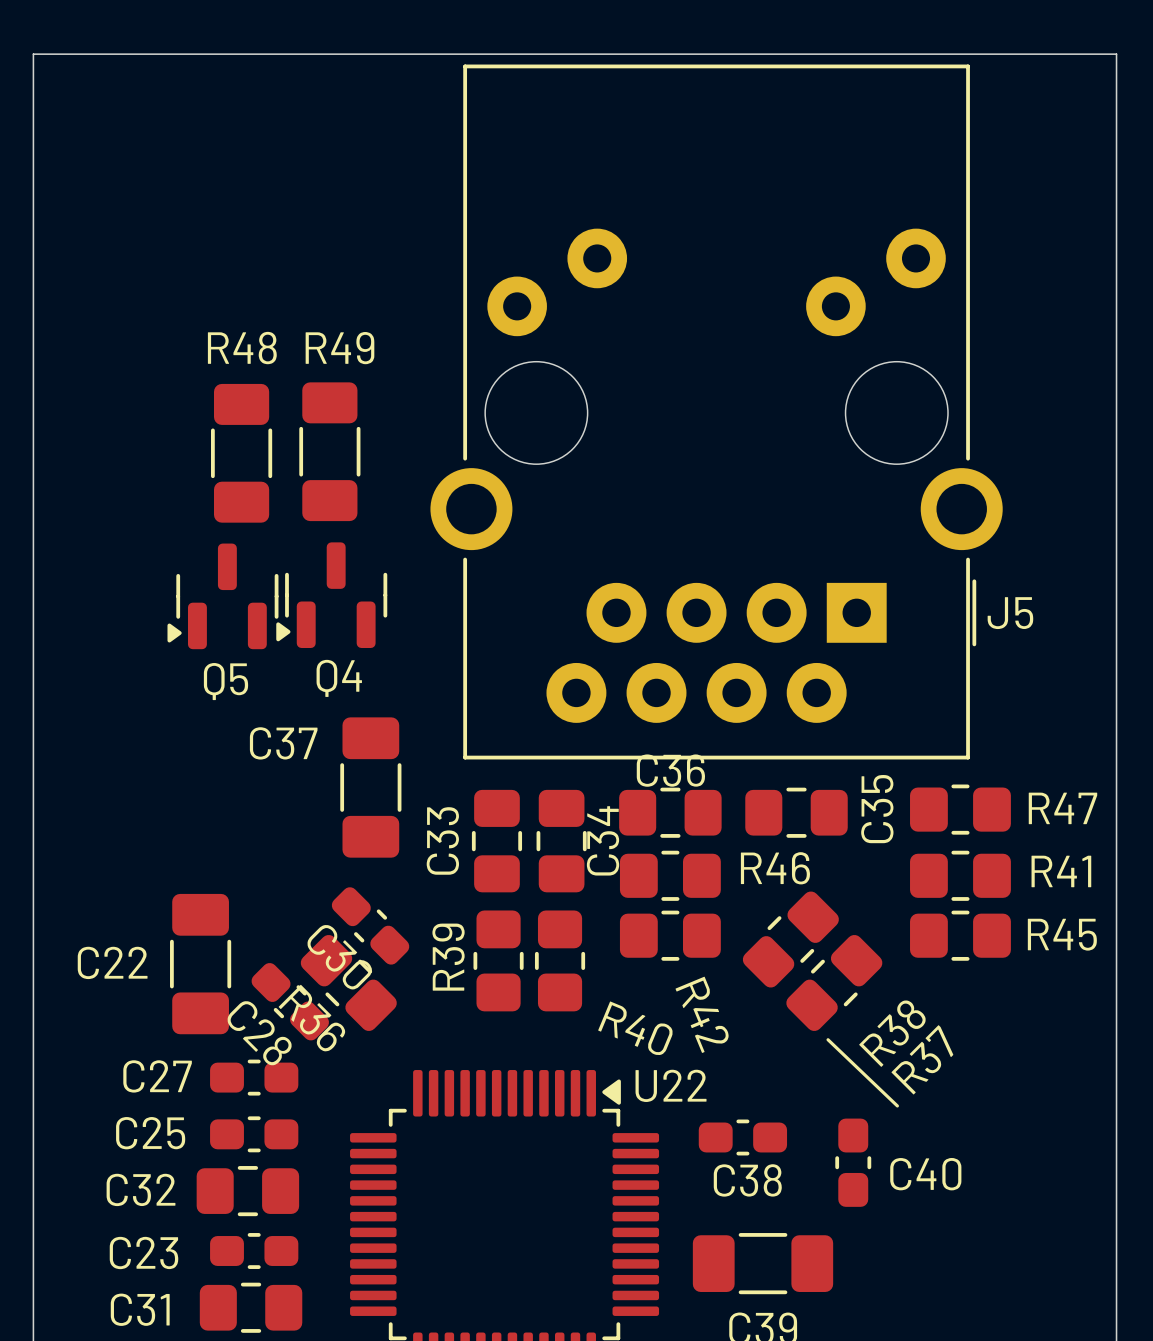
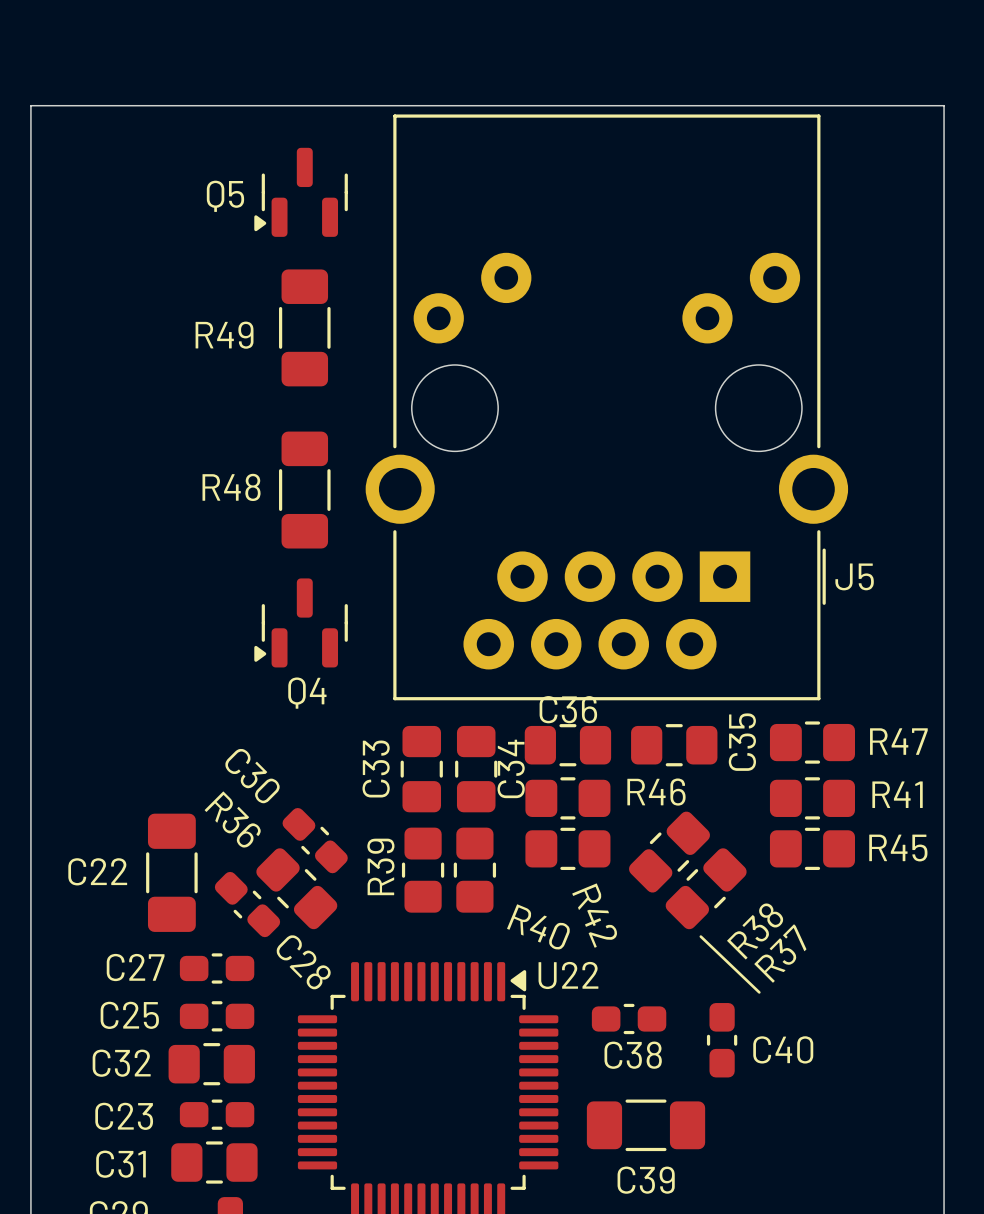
R48 name position: R48 (242, 348) -> R48 (231, 487)
R49 name position: R49 (339, 348) -> R49 (224, 335)
R48 position: (329, 451) -> (304, 490)
R49 position: (241, 453) -> (304, 327)
Q4 position: (331, 595) -> (301, 622)
Q5 position: (222, 596) -> (301, 192)
Q5 name position: Q5 (226, 681) -> Q5 (225, 196)
C37: (370, 787) -> none
C30 name position: C30 (339, 957) -> C30 (252, 775)
R36 name position: R36 (311, 1018) -> R36 (232, 819)
C28 name position: C28 (259, 1033) -> C28 (303, 962)

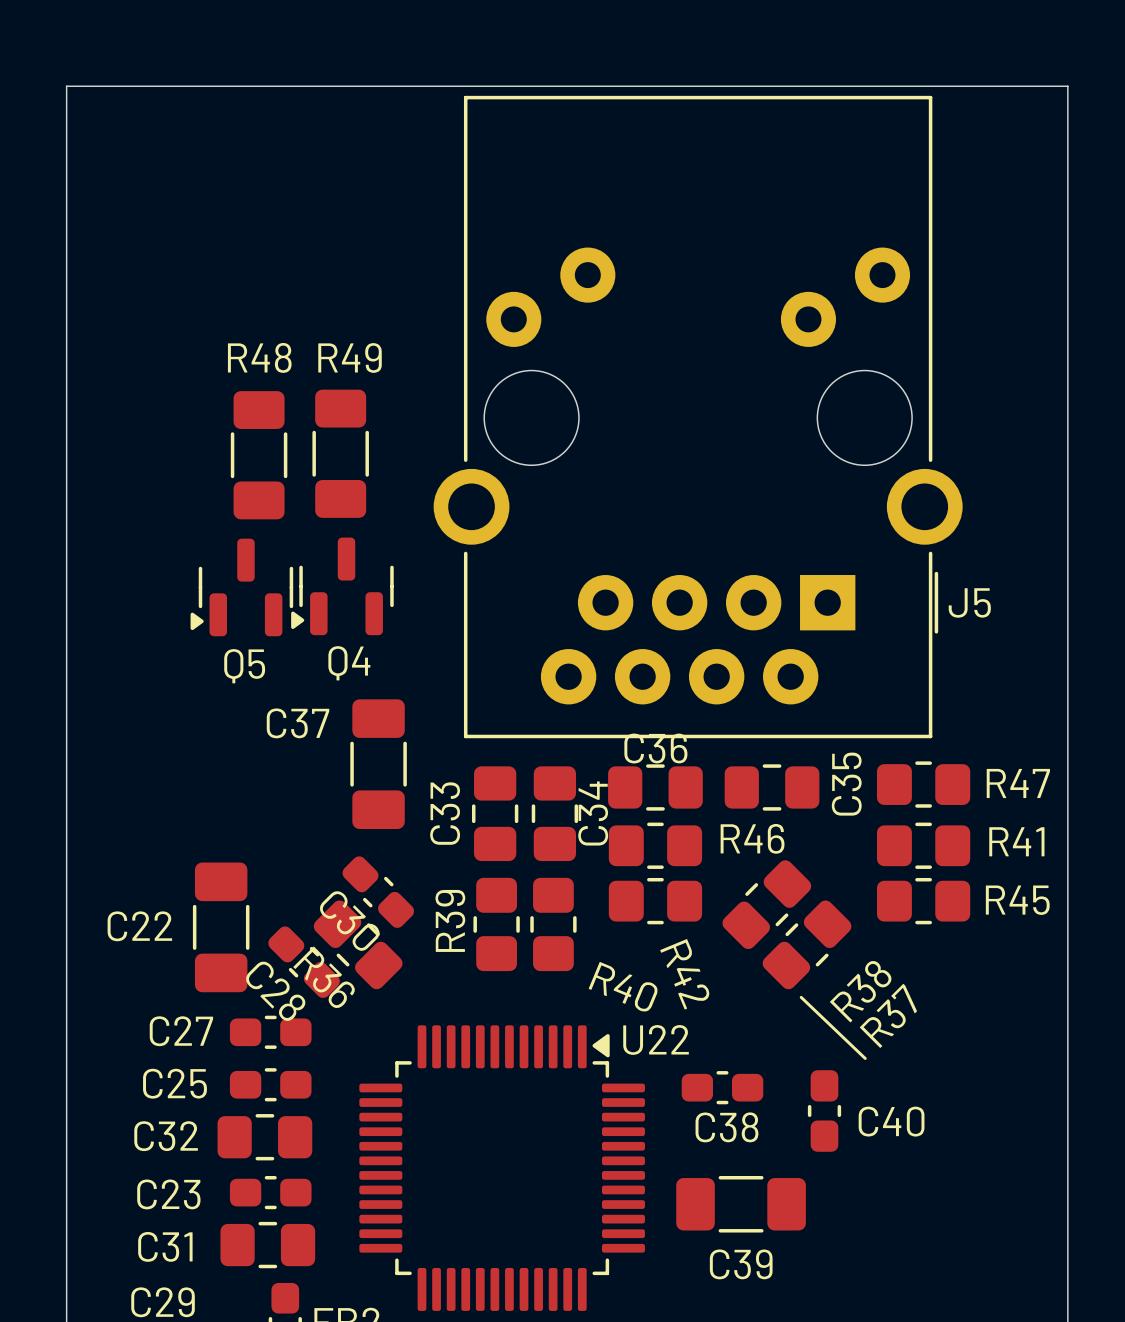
Q5 position: (301, 192) -> (241, 587)
Q5 name position: Q5 (225, 196) -> Q5 (244, 666)
R49 position: (304, 327) -> (259, 455)
R49 name position: R49 (224, 335) -> R49 (350, 357)
R48 name position: R48 (231, 487) -> R48 (259, 357)
R48 position: (304, 490) -> (340, 453)
Q4 position: (301, 622) -> (342, 586)
C37: none -> (378, 764)
C30 name position: C30 (252, 775) -> C30 (349, 920)
R36 name position: R36 (232, 819) -> R36 (324, 977)
C28 name position: C28 (303, 962) -> C28 (275, 991)

